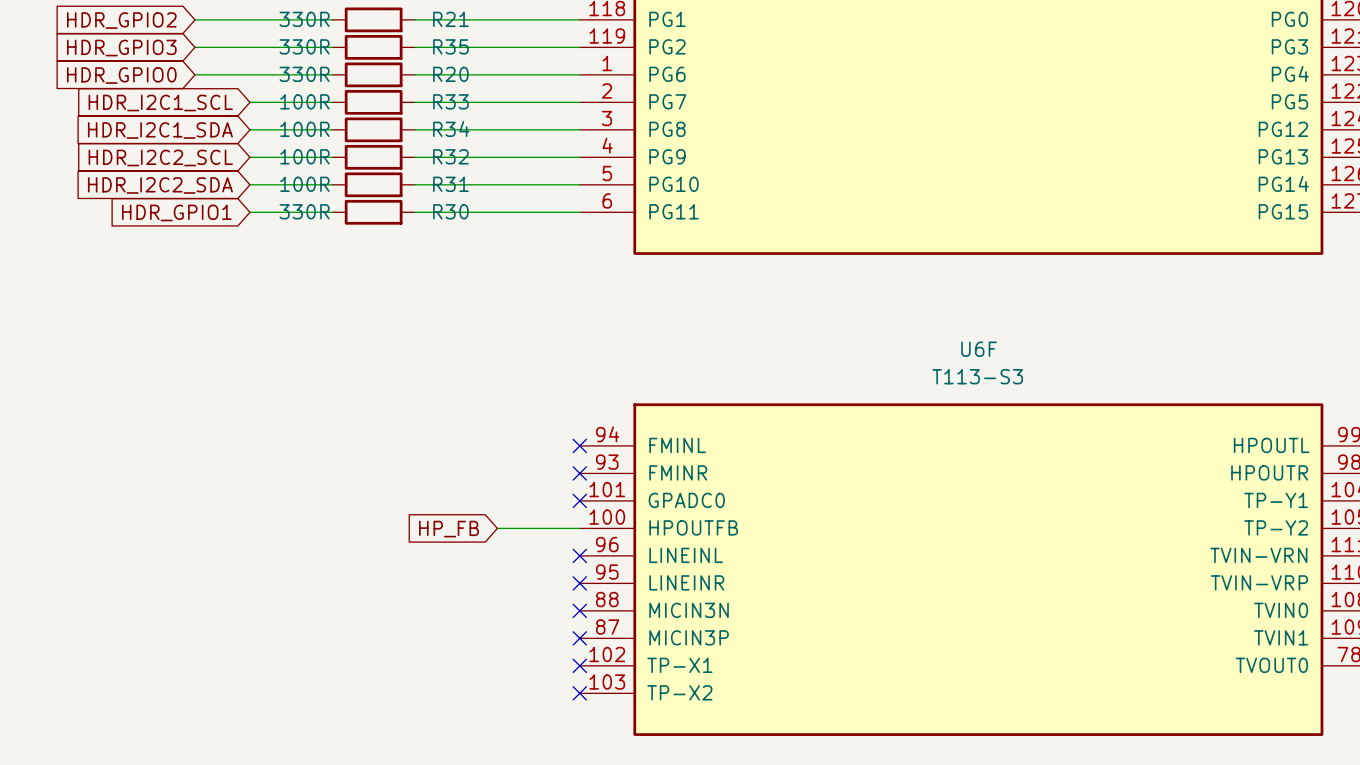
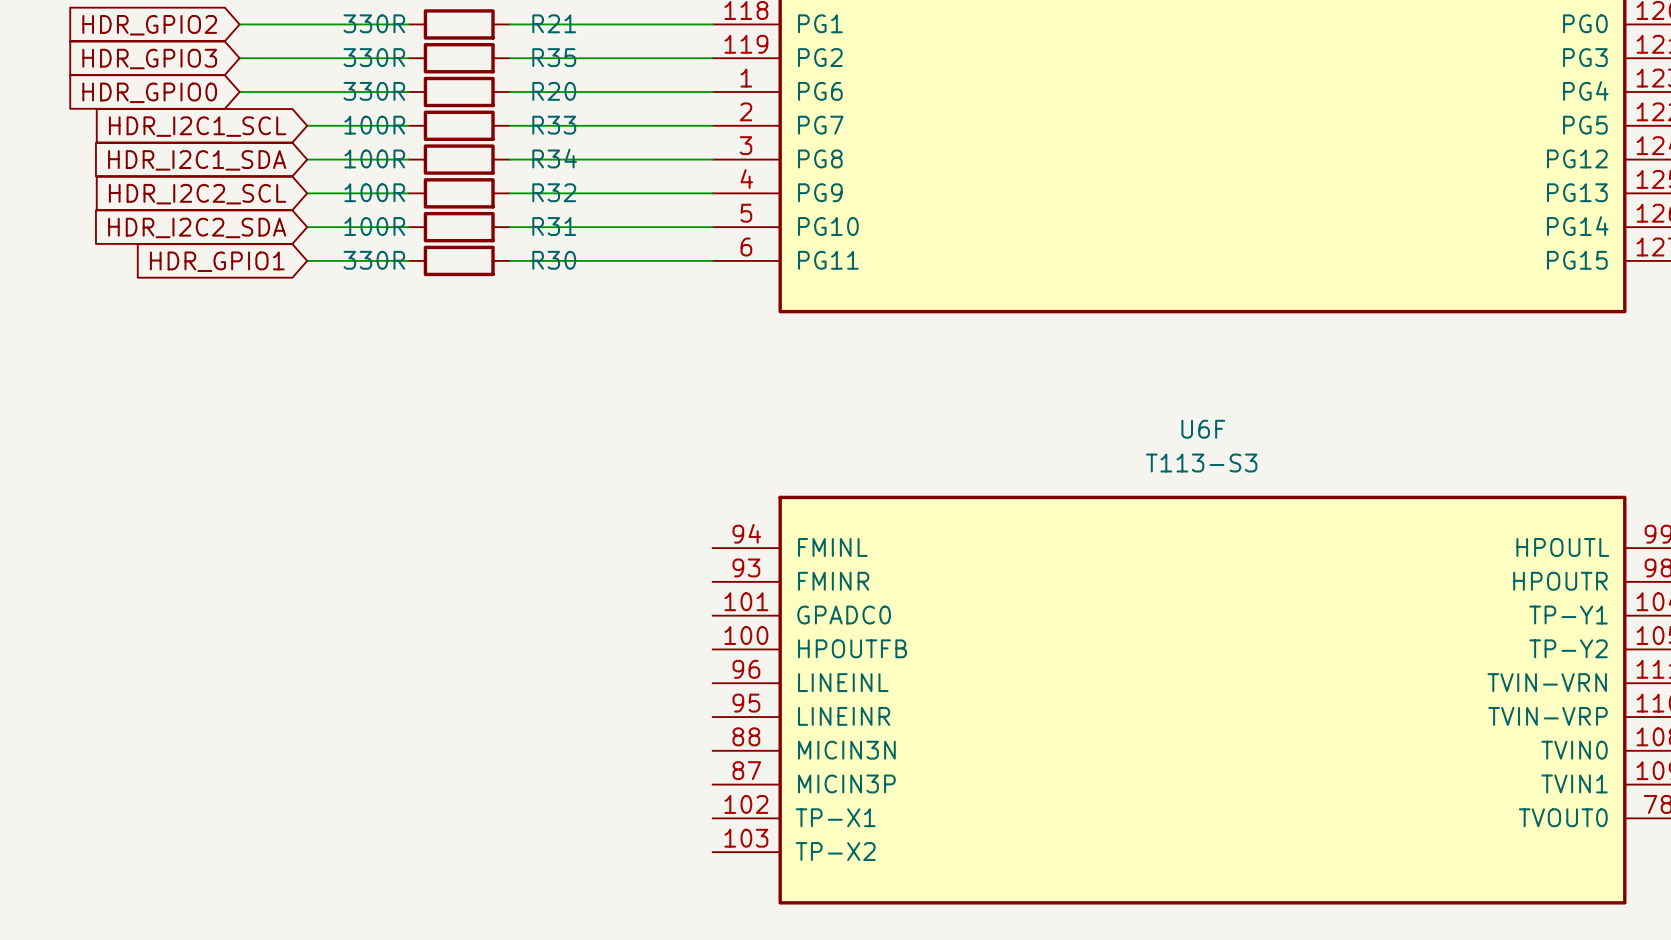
no-connect mark: (579, 445) -> none
no-connect mark: (579, 473) -> none
no-connect mark: (579, 500) -> none
wire: (497, 528) (579, 528) -> none
global label: HP_FB (449, 529) -> none
no-connect mark: (579, 555) -> none
no-connect mark: (579, 583) -> none
no-connect mark: (579, 610) -> none
no-connect mark: (579, 638) -> none
no-connect mark: (579, 665) -> none
no-connect mark: (579, 693) -> none

